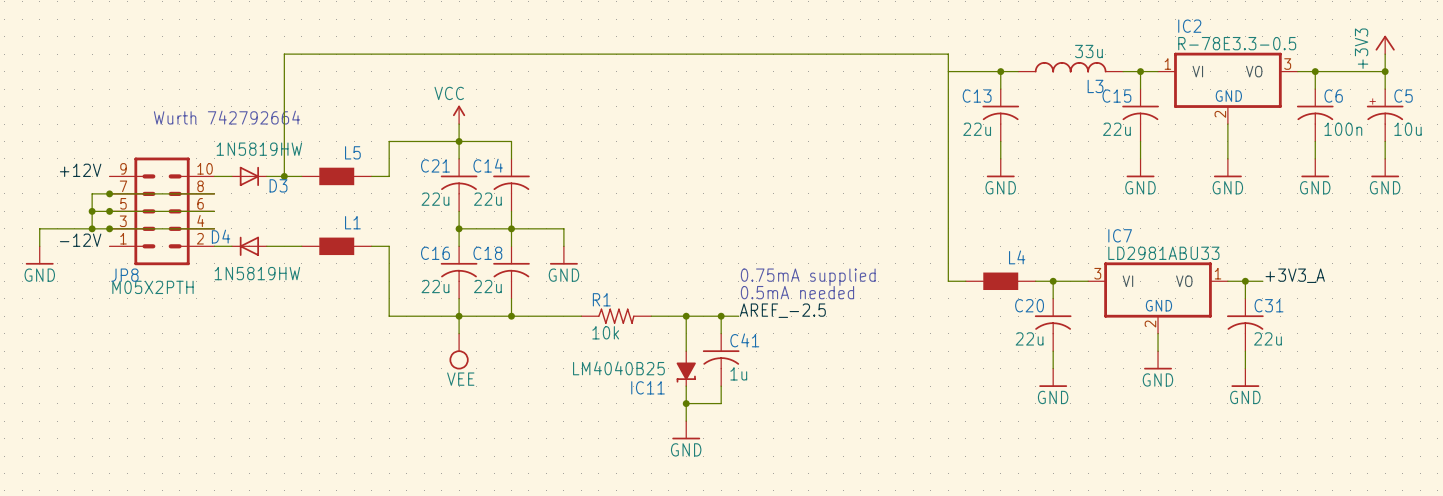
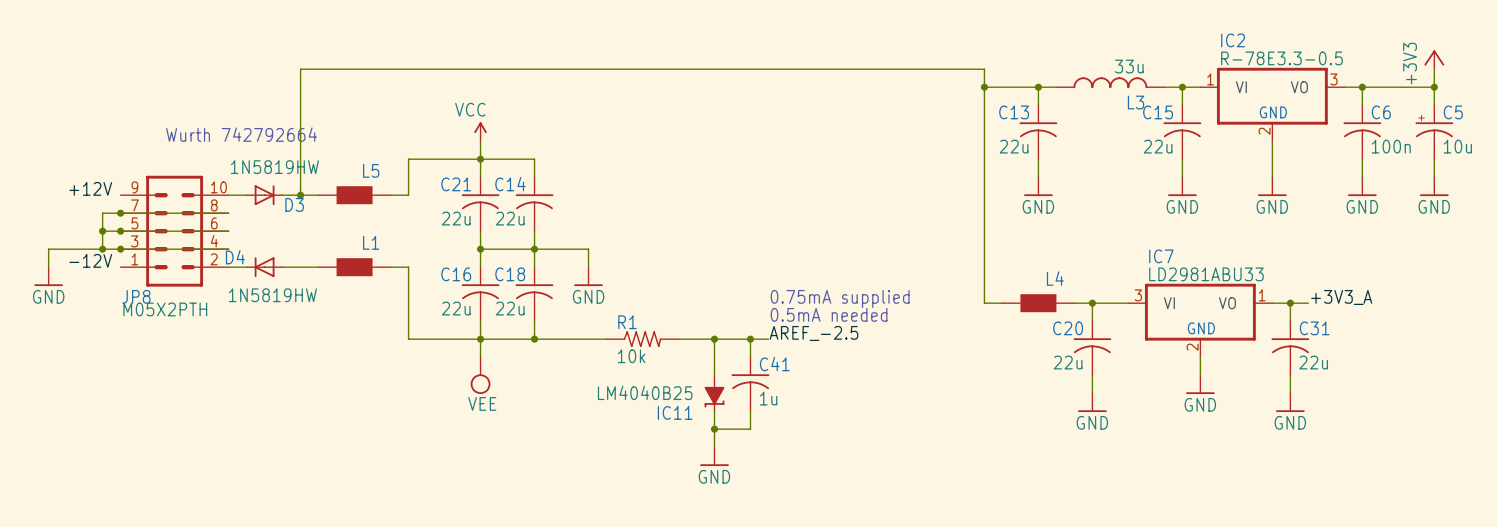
junction: none -> (984, 87)

